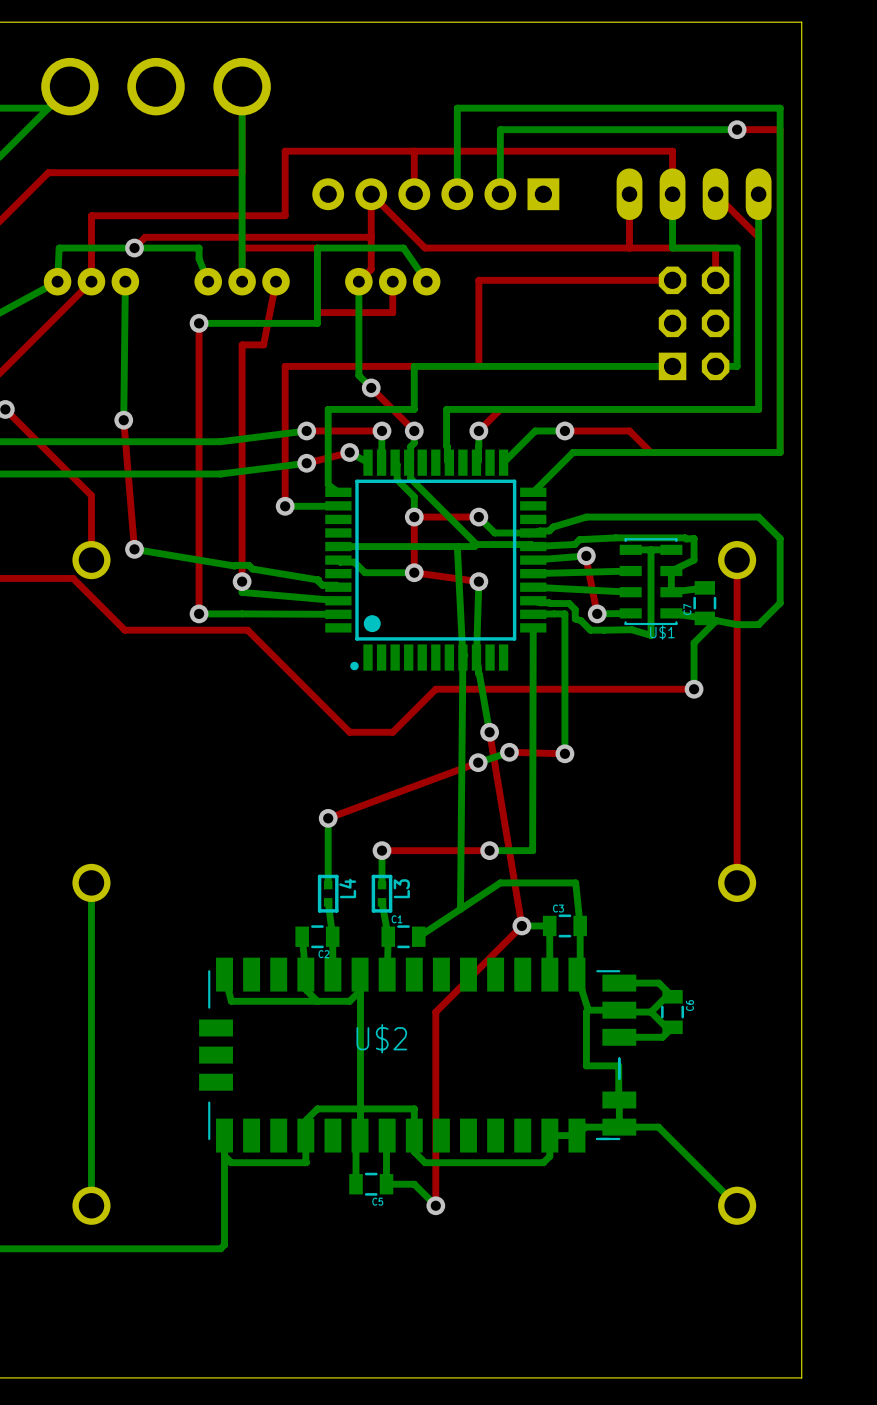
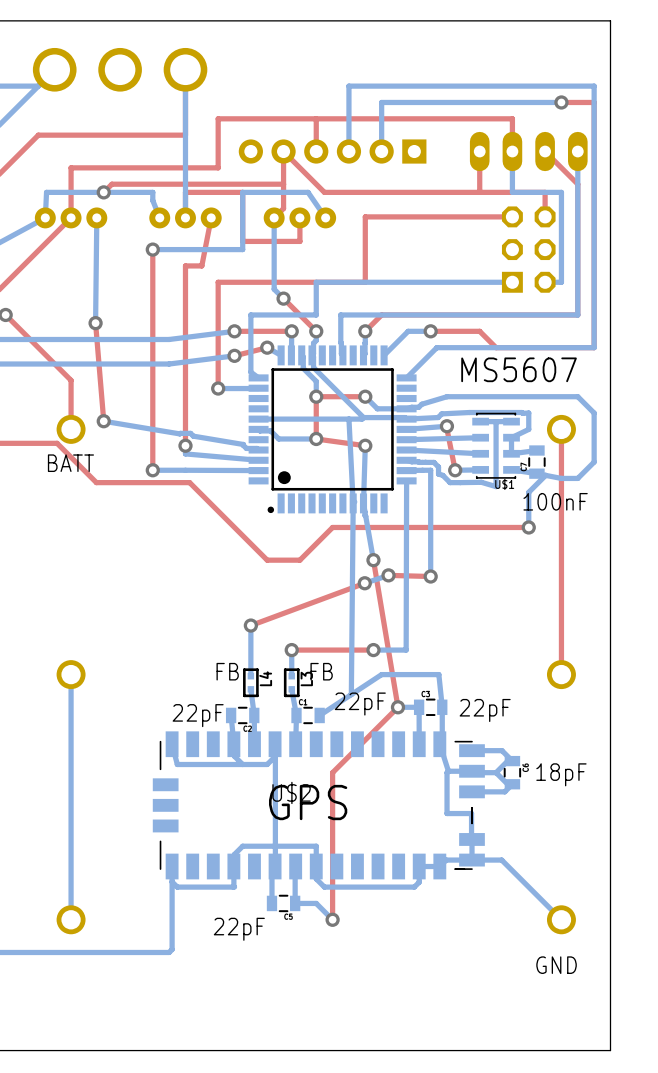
text: none -> MS5607 (519, 369)
text: none -> BATT (70, 463)
text: none -> 100nF (555, 501)
text: none -> FB (227, 671)
text: none -> FB (321, 671)
text: none -> 22pF (360, 704)
text: none -> 22pF (485, 710)
text: none -> 22pF (198, 715)
text: none -> 18pF (561, 774)
text: none -> GPS (308, 802)
text: none -> 22pF (239, 929)
text: none -> GND (556, 965)

